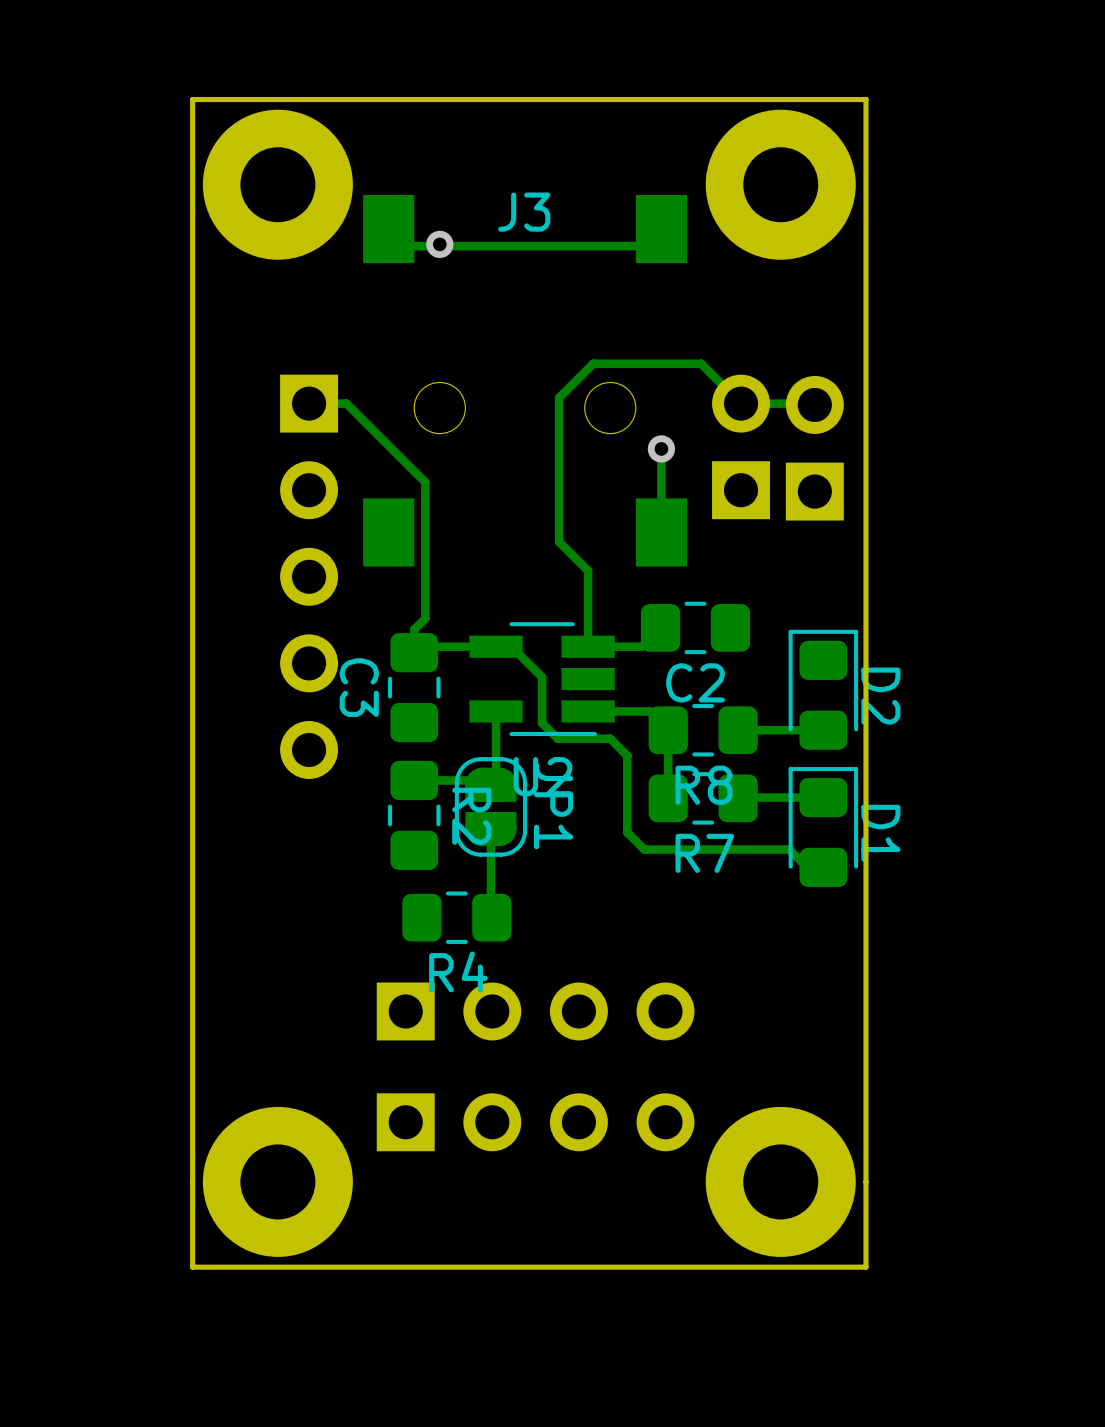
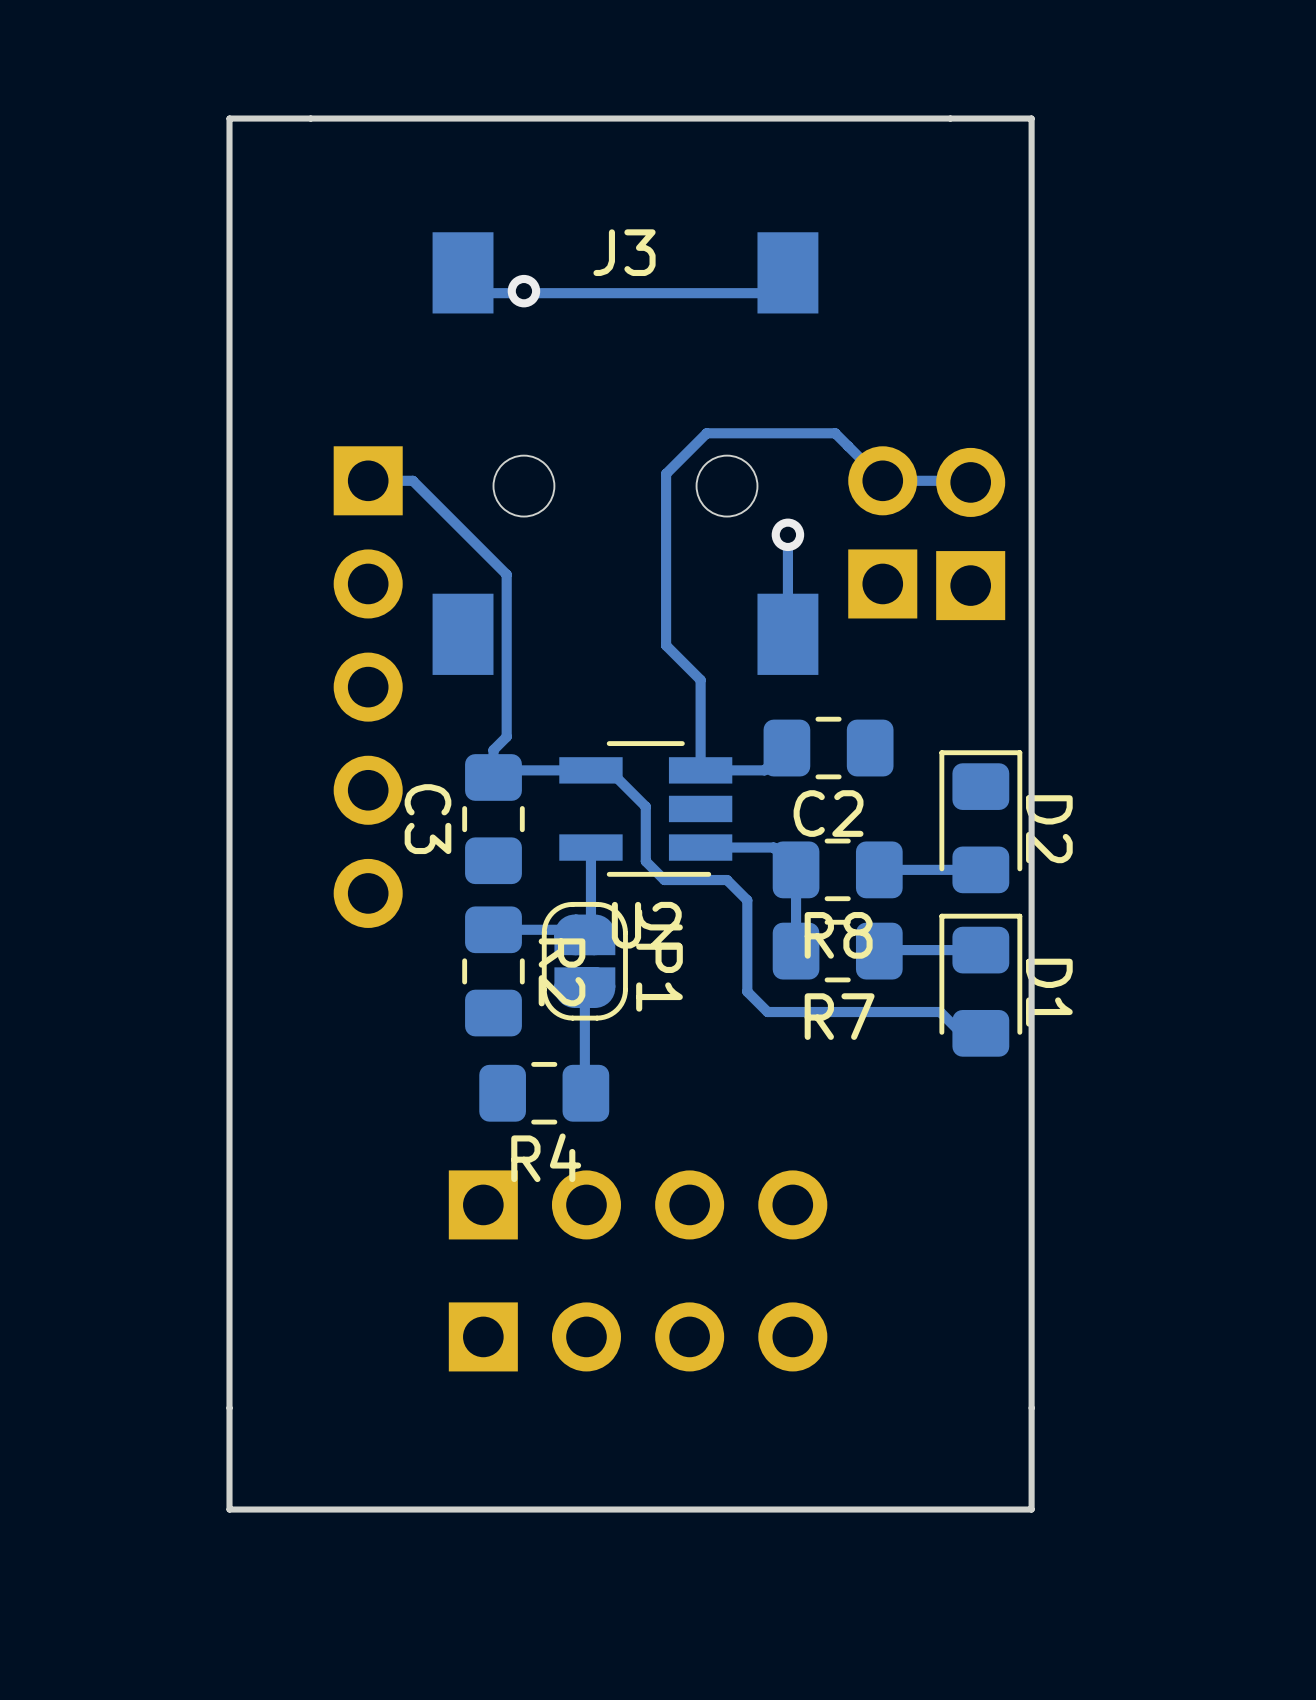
part: (277, 184) -> none
part: (780, 184) -> none
part: (277, 1181) -> none
part: (780, 1181) -> none

